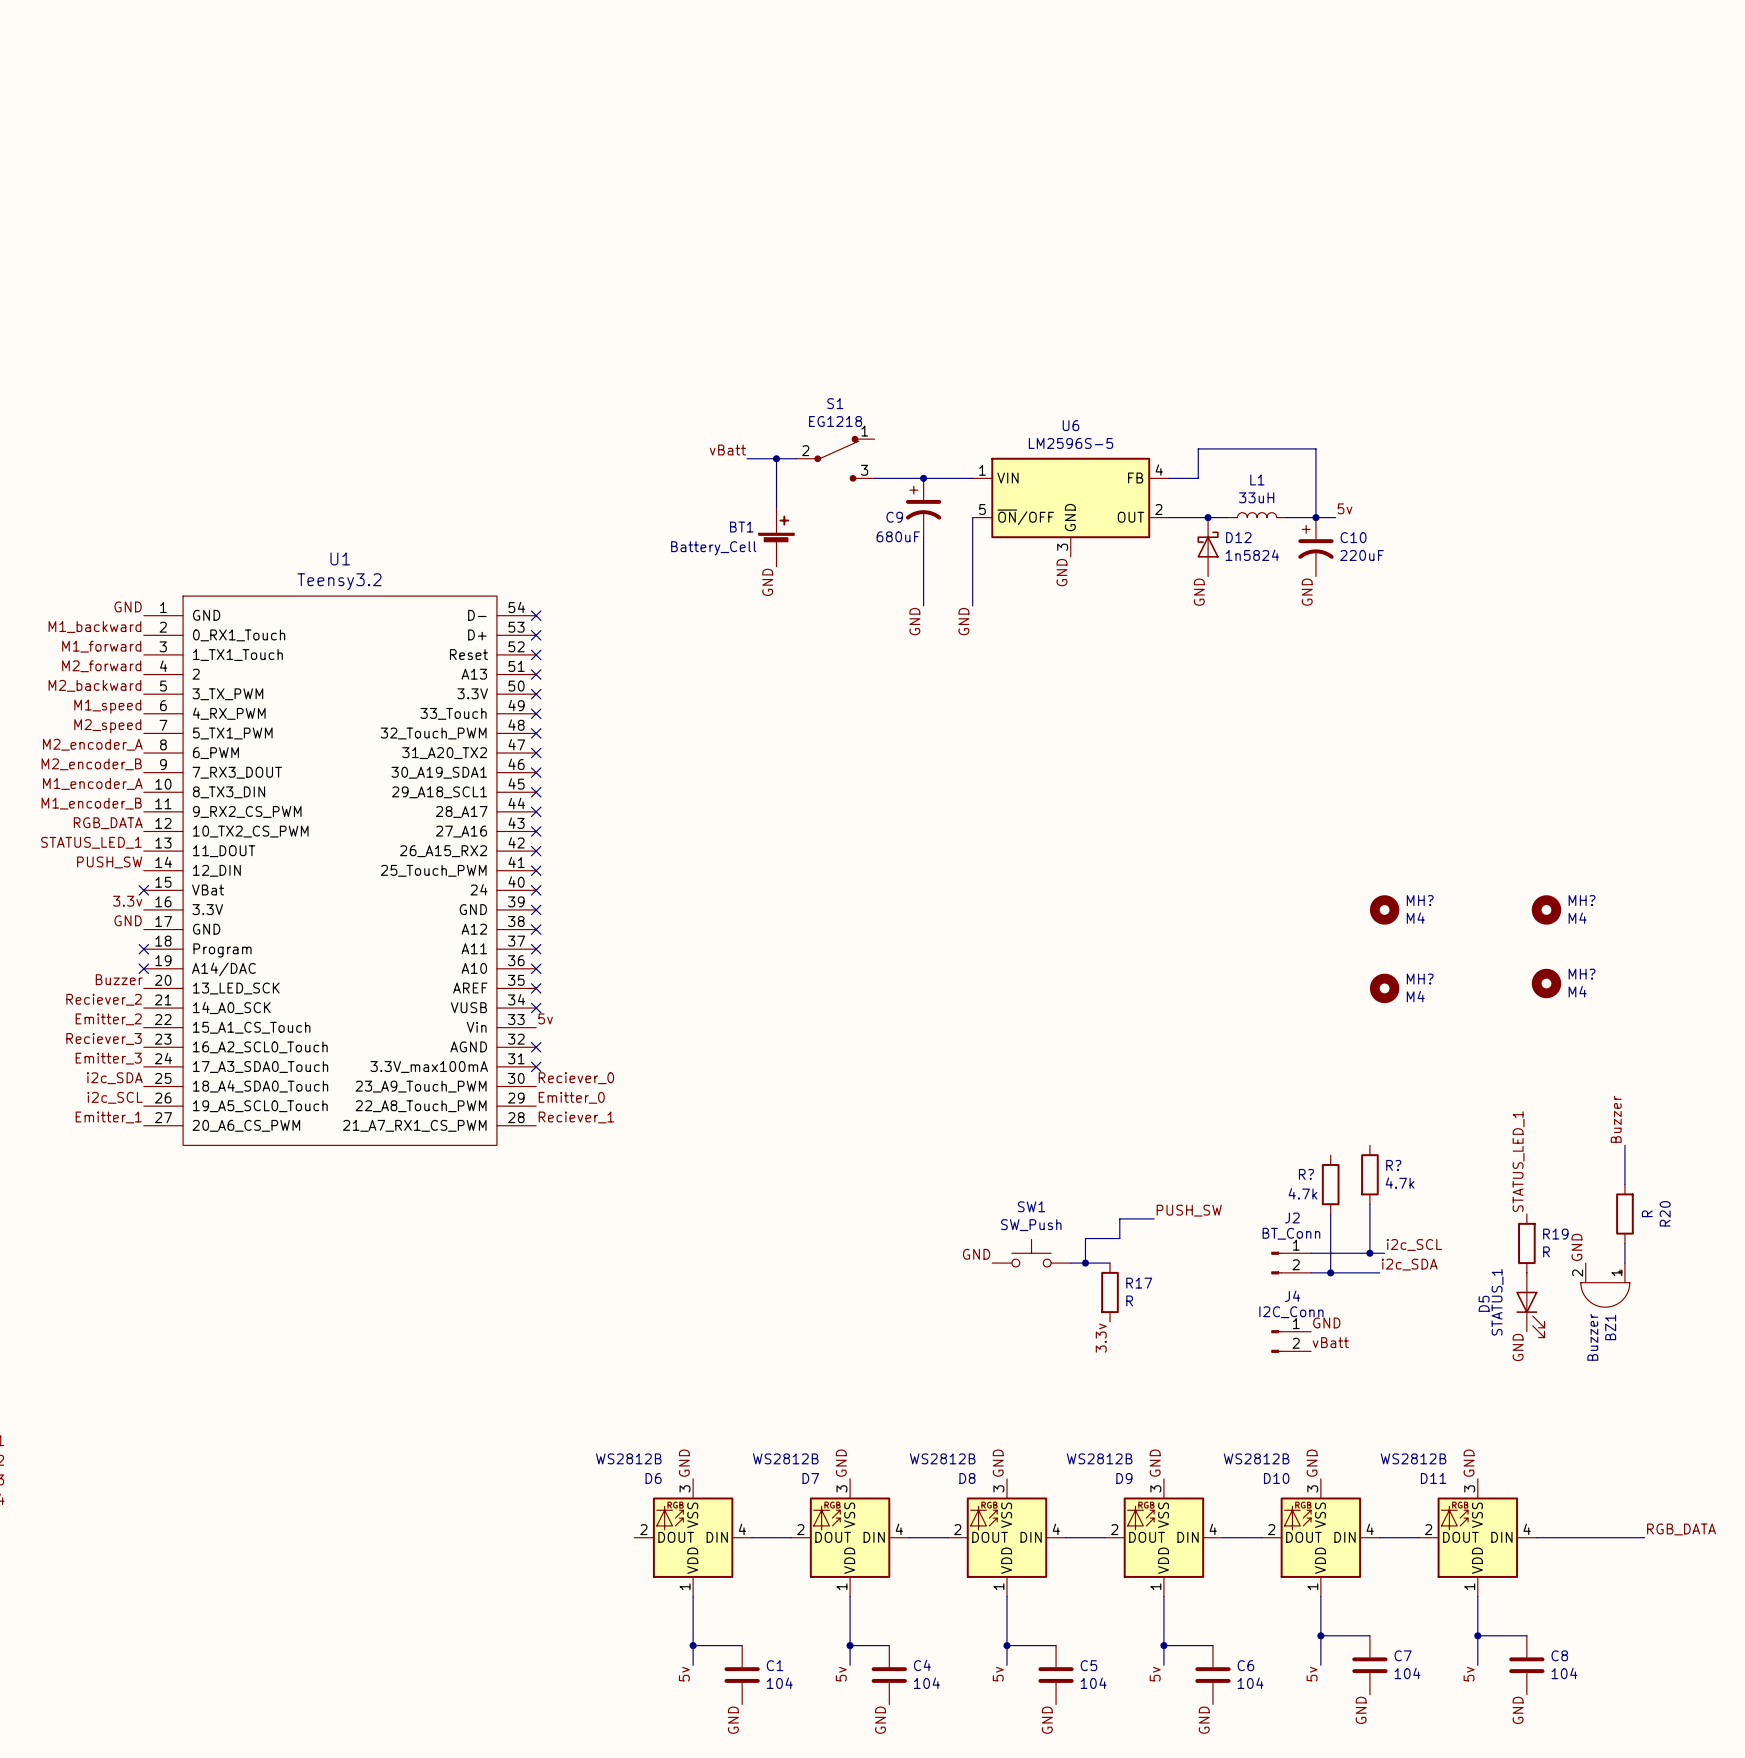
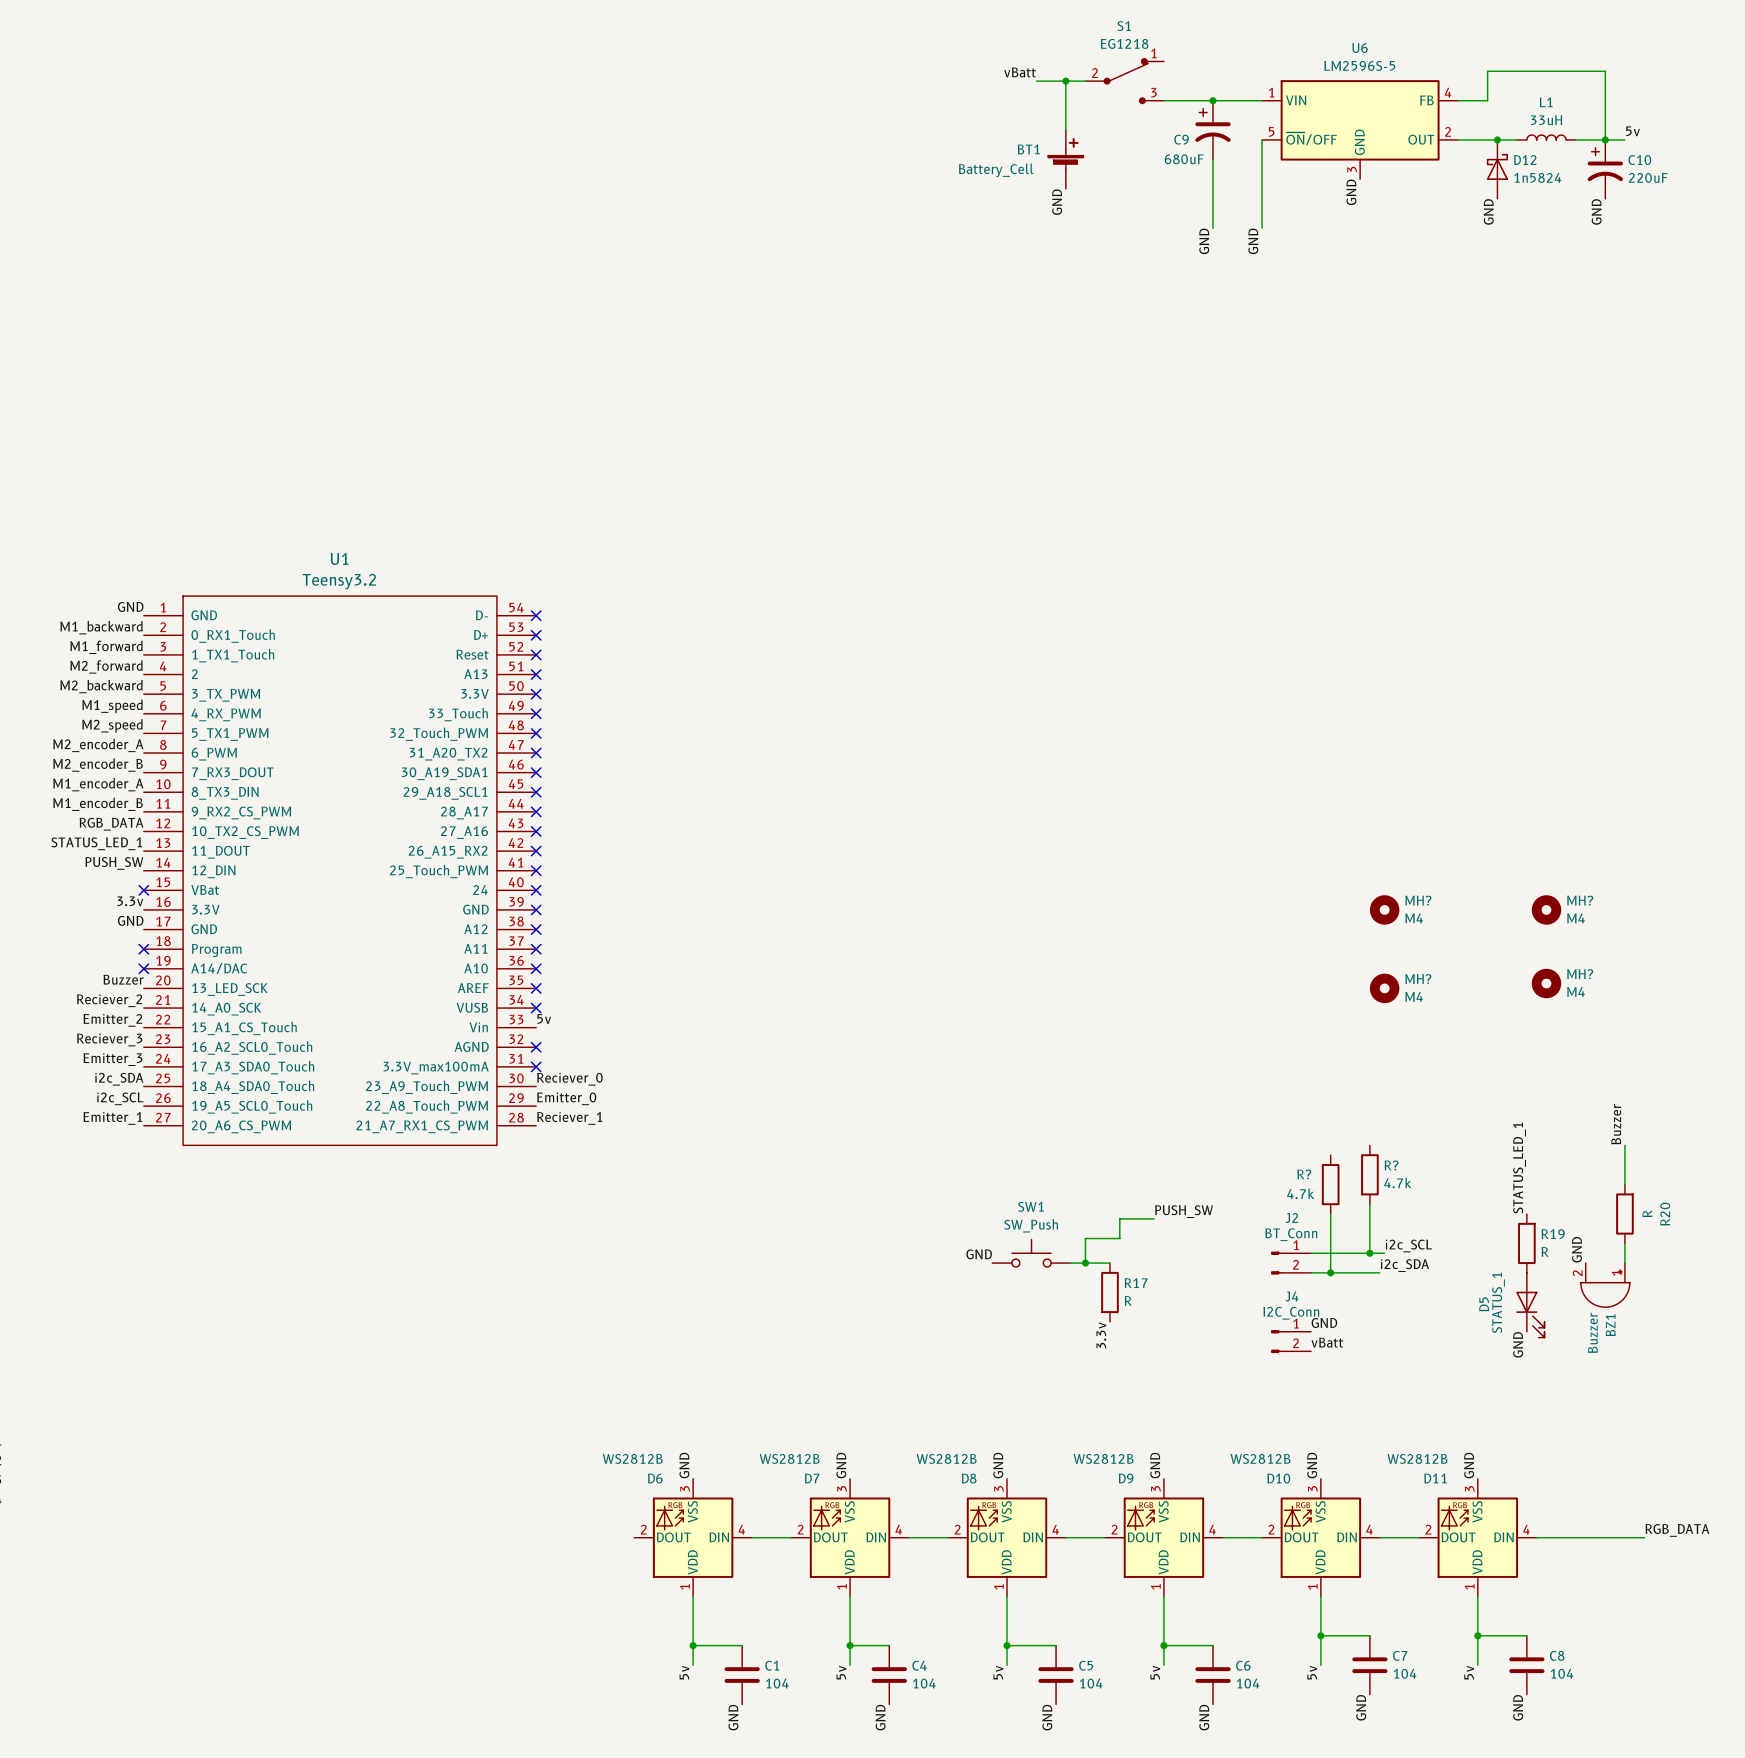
label: none -> vBatt (1020, 72)
wire: none -> (1036, 81) (1085, 81)
wire: none -> (1065, 81) (1065, 130)
junction: none -> (1065, 81)
wire: none -> (1163, 100) (1262, 100)
junction: none -> (1212, 100)
wire: none -> (1458, 100) (1487, 100) (1487, 71) (1605, 71) (1605, 139)
label: none -> 5v (1633, 131)
wire: none -> (1262, 139) (1262, 228)
wire: none -> (1458, 139) (1517, 139)
junction: none -> (1497, 139)
wire: none -> (1575, 139) (1624, 139)
junction: none -> (1605, 139)
wire: none -> (1212, 159) (1212, 228)
label: none -> GND (1351, 192)
label: none -> GND (1057, 202)
label: none -> GND (1488, 211)
label: none -> GND (1596, 211)
label: none -> GND (1204, 241)
label: none -> GND (1253, 241)
label: vBatt (727, 449) -> none
wire: (747, 458) (796, 458) -> none
wire: (776, 458) (776, 507) -> none
junction: (776, 458) -> none
S1 position: (835, 458) -> (1124, 81)
wire: (874, 478) (972, 478) -> none
junction: (923, 478) -> none
wire: (1168, 478) (1198, 478) (1198, 448) (1315, 448) (1315, 517) -> none
C9 position: (923, 507) -> (1212, 130)
U6 position: (1070, 507) -> (1360, 129)
label: 5v (1345, 508) -> none
L1 position: (1257, 515) -> (1546, 137)
wire: (972, 517) (972, 605) -> none
wire: (1168, 517) (1227, 517) -> none
junction: (1208, 517) -> none
wire: (1286, 517) (1335, 517) -> none
junction: (1315, 517) -> none
BT1 position: (776, 537) -> (1065, 159)
wire: (923, 537) (923, 605) -> none
D12 position: (1208, 547) -> (1497, 169)
C10 position: (1315, 547) -> (1605, 169)
label: GND (1062, 572) -> none
label: GND (767, 582) -> none
label: GND (1199, 592) -> none
label: GND (1307, 592) -> none
label: GND (914, 621) -> none
label: GND (963, 621) -> none

